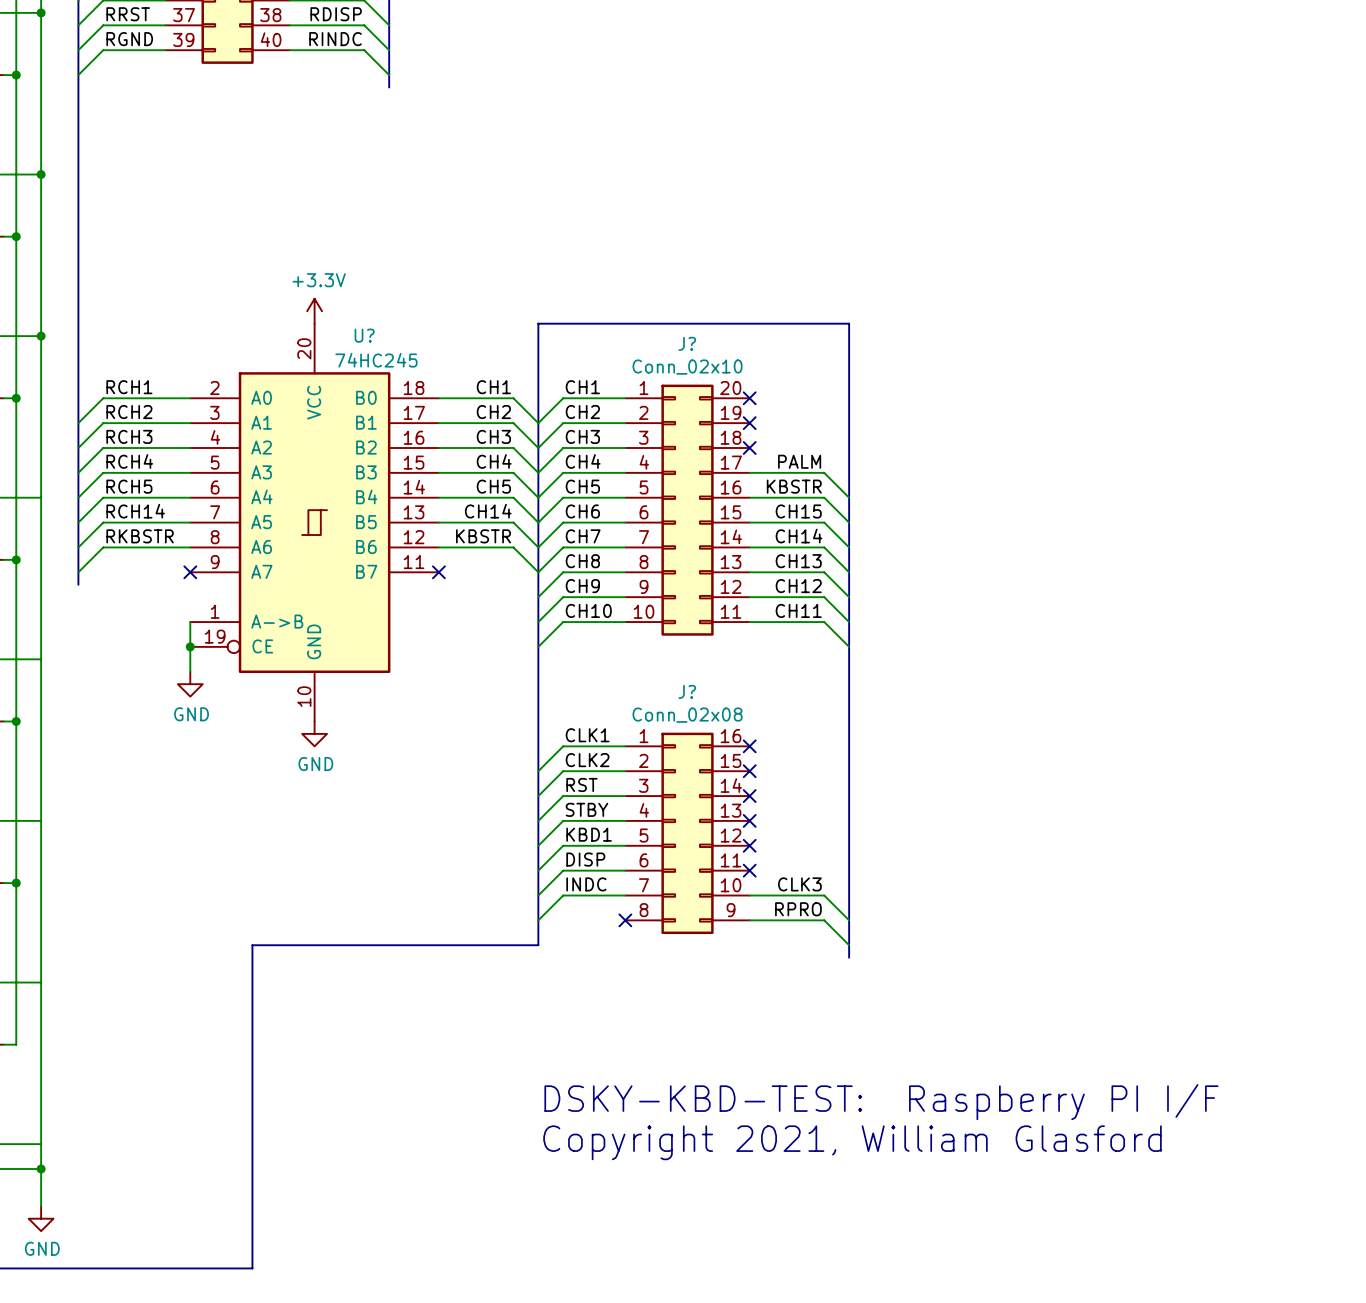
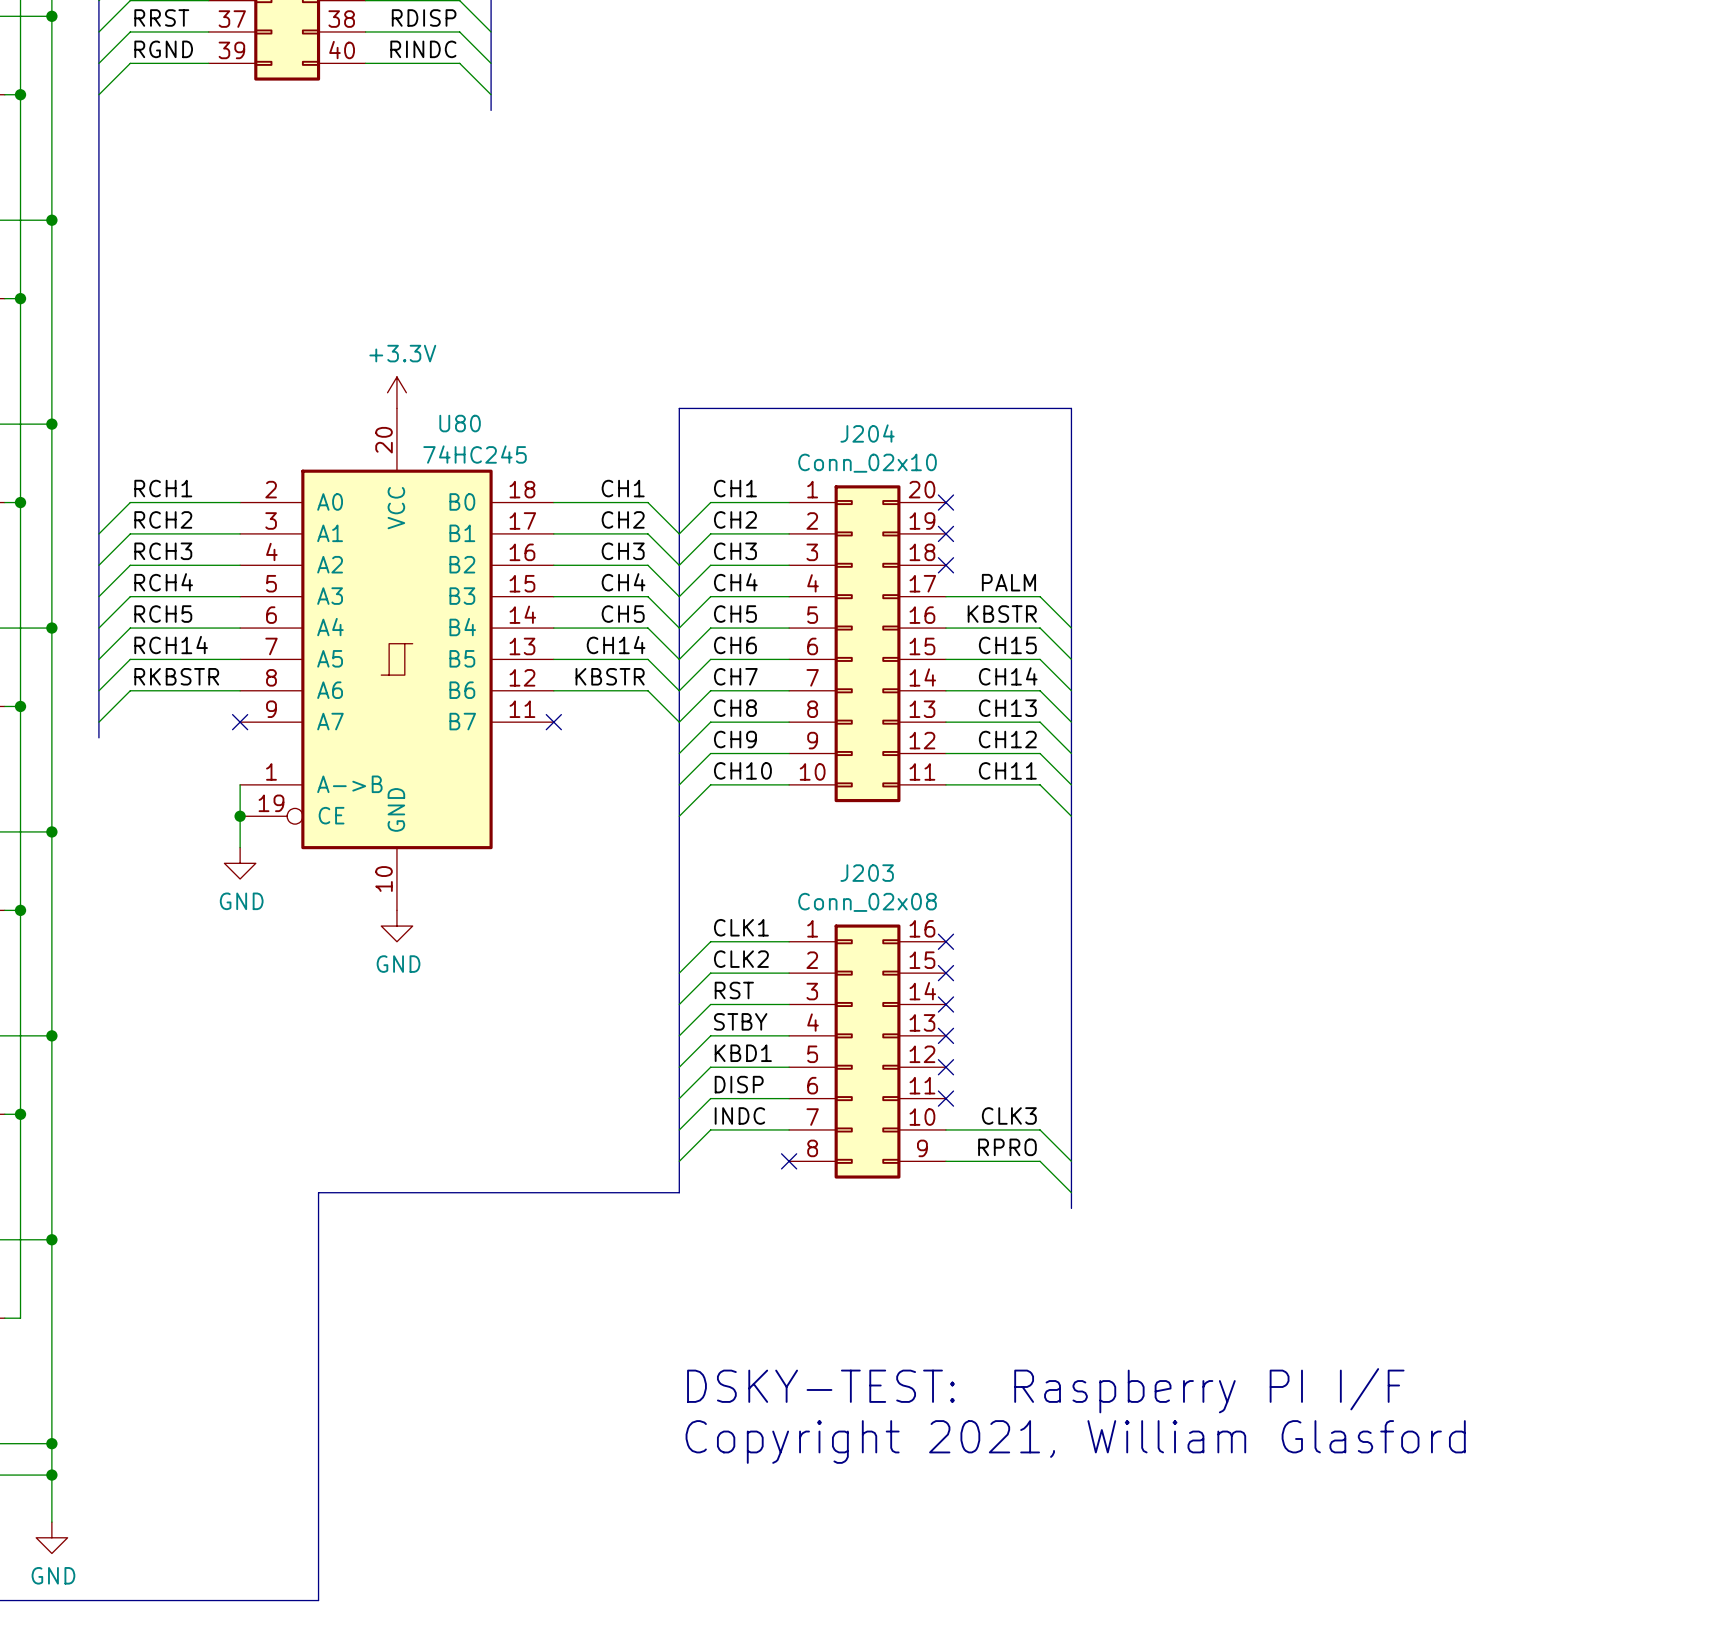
U? name: U? (364, 335) -> U80 (460, 423)
J? name: J? (687, 343) -> J204 (867, 433)
junction: none -> (51, 628)
junction: none -> (51, 831)
J? name: J? (687, 691) -> J203 (867, 873)
junction: none -> (51, 1035)
junction: none -> (51, 1239)
text: DSKY-KBD-TEST: Raspberry PI I/F (881, 1102) -> DSKY-TEST: Raspberry PI I/F (1045, 1390)
junction: none -> (51, 1443)

